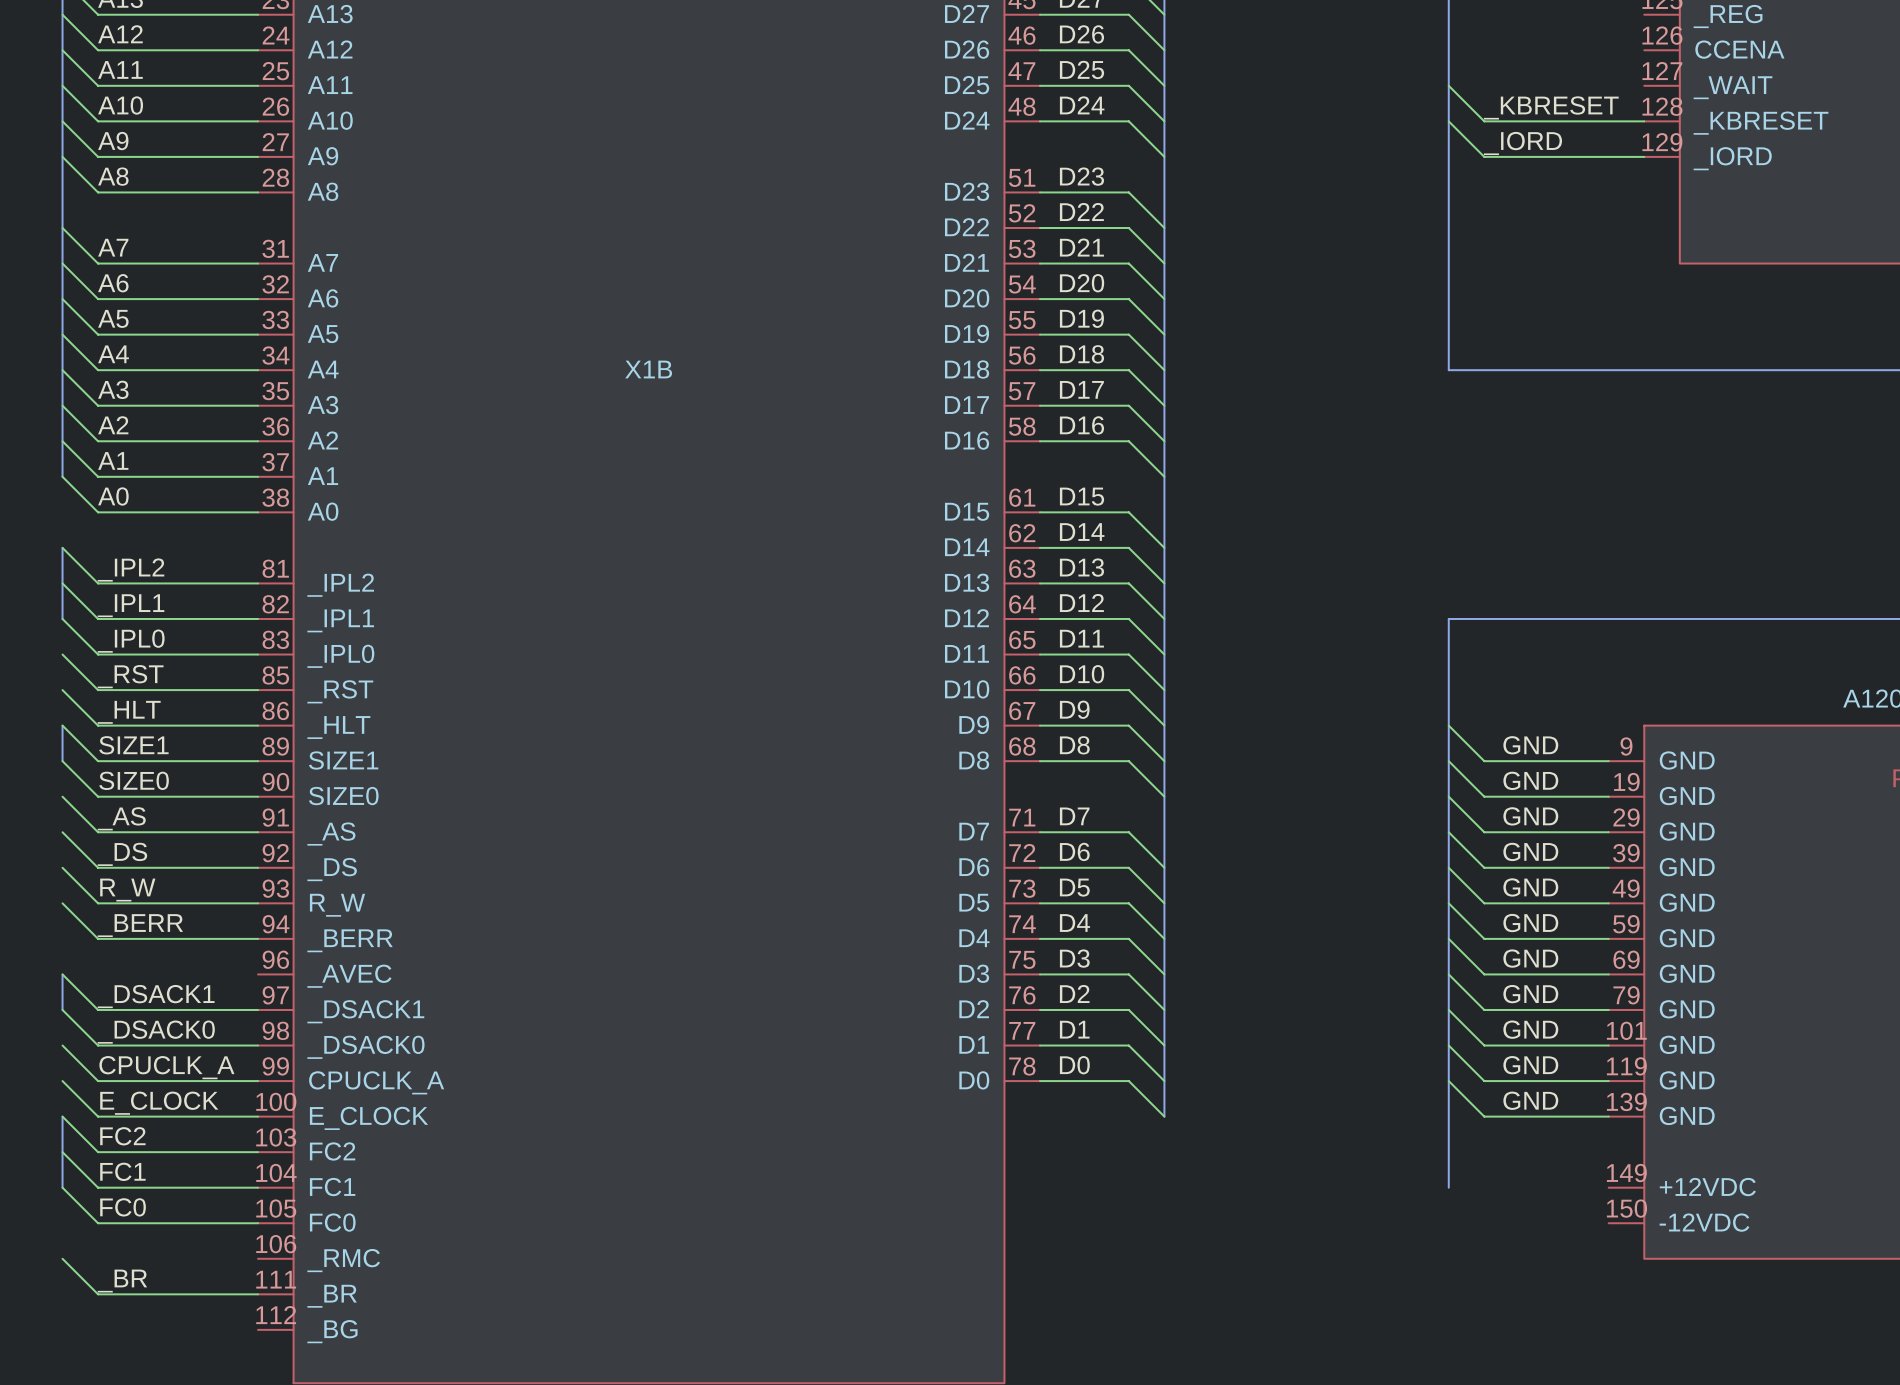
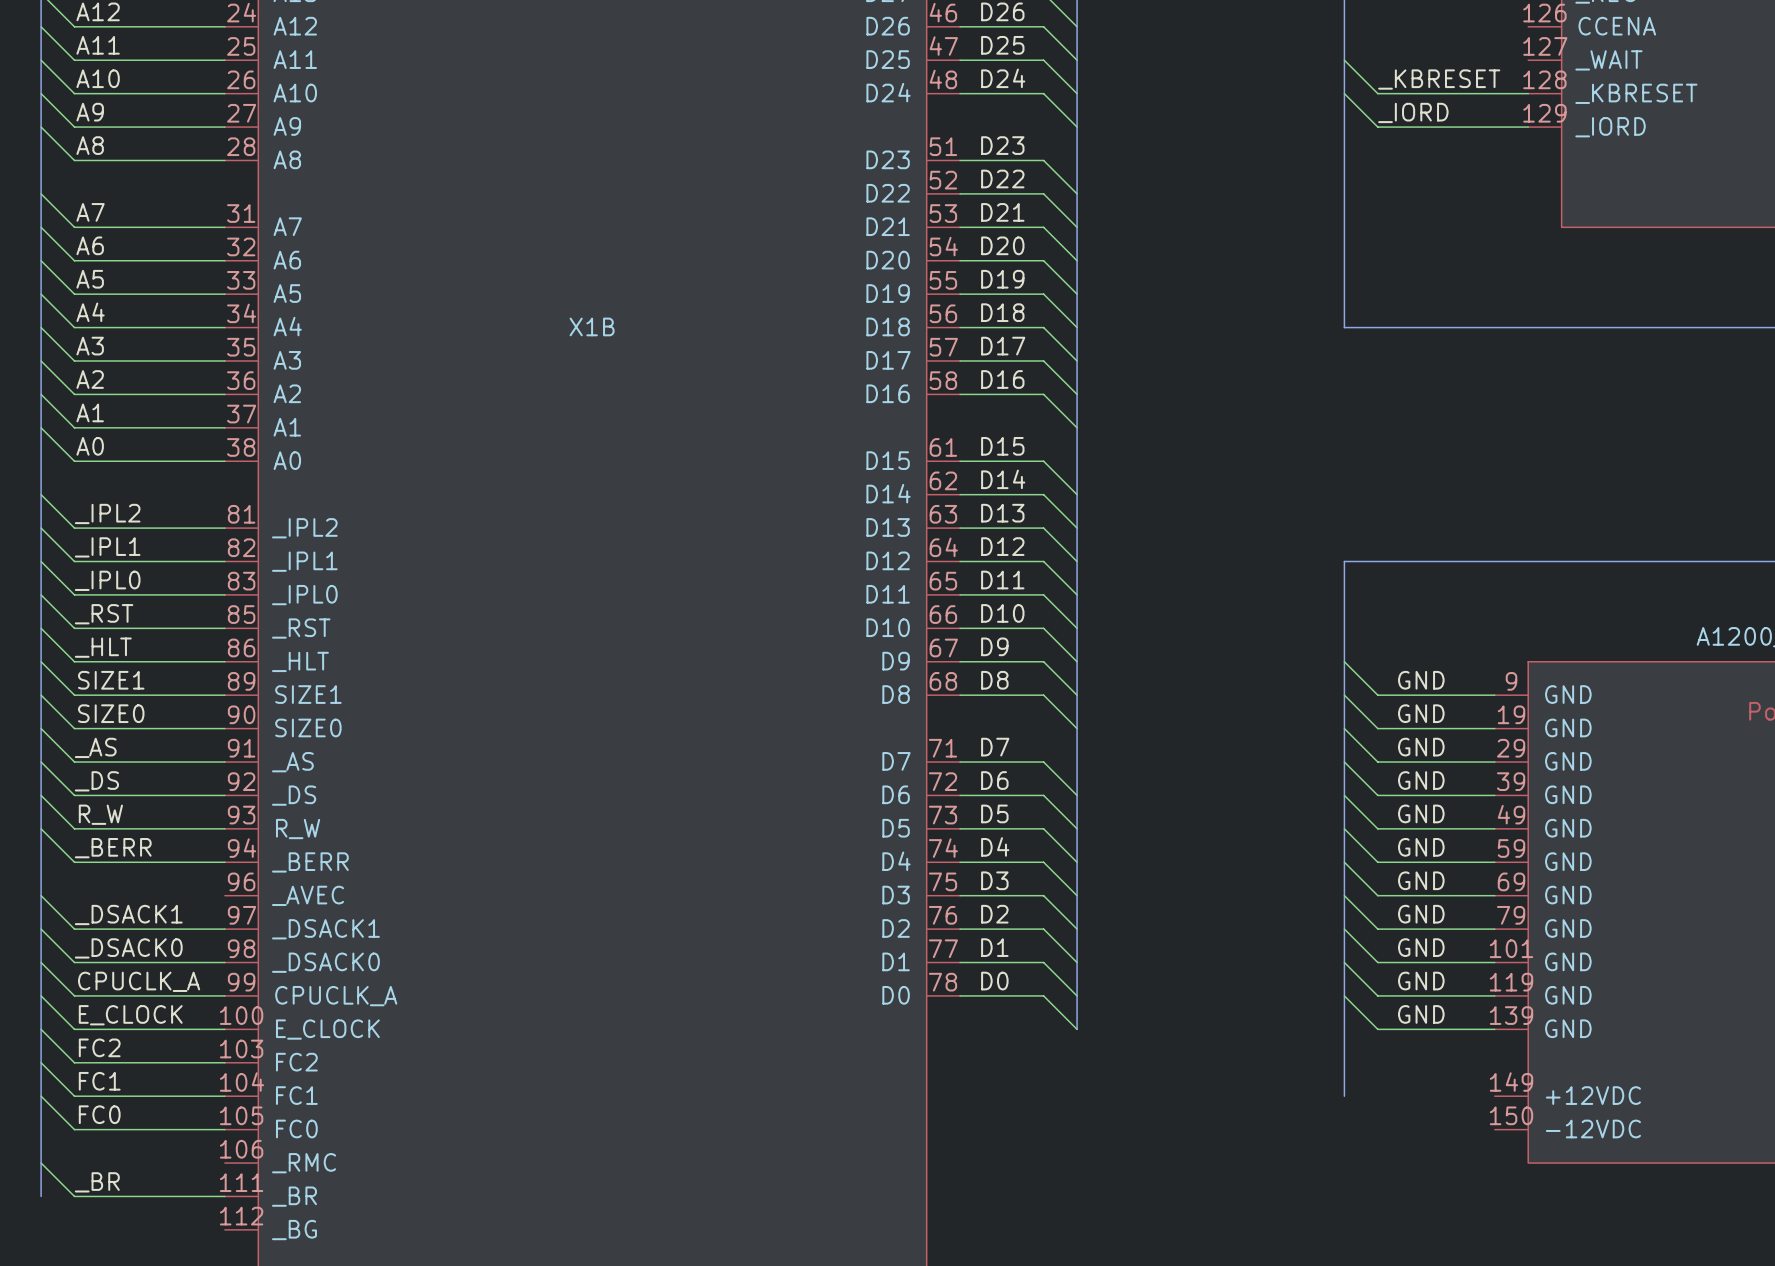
bus: none -> (41, 427) (41, 494)
bus: none -> (41, 561) (41, 661)
bus: none -> (41, 695) (41, 895)
bus: none -> (41, 929) (41, 1029)
bus: none -> (41, 1096) (41, 1196)

